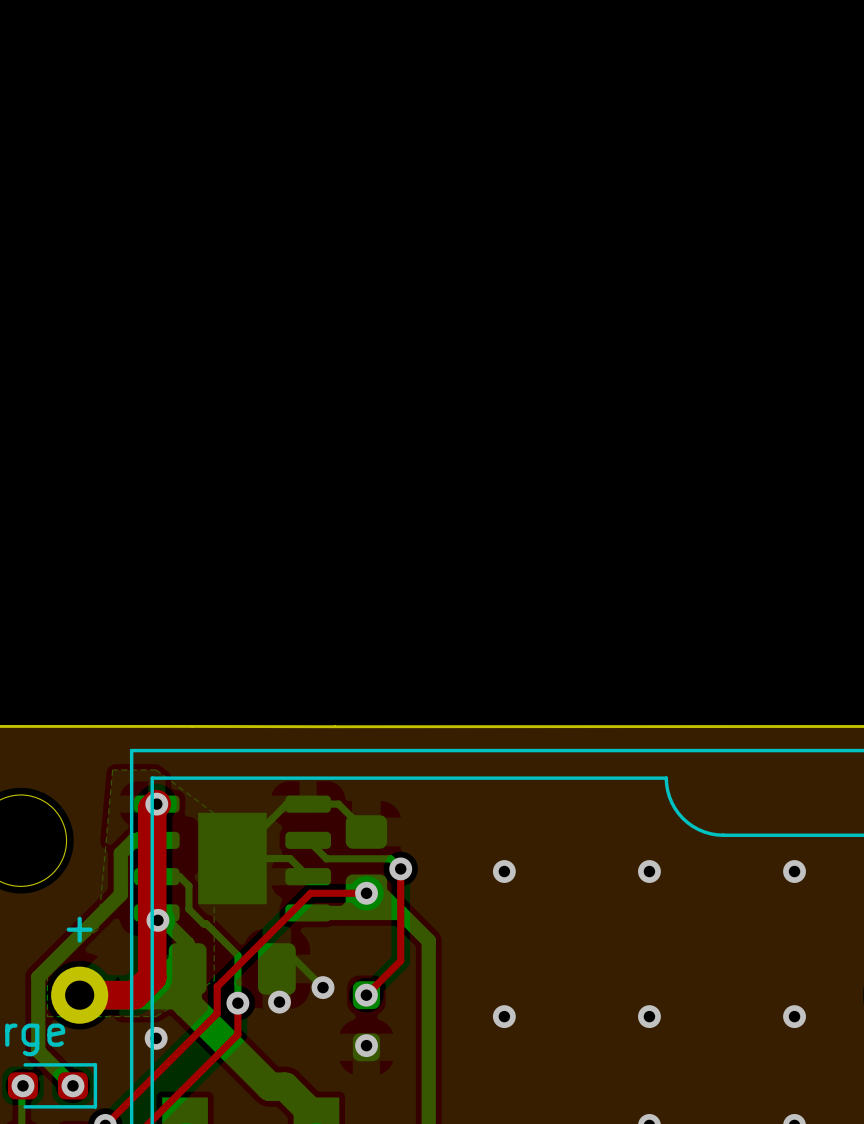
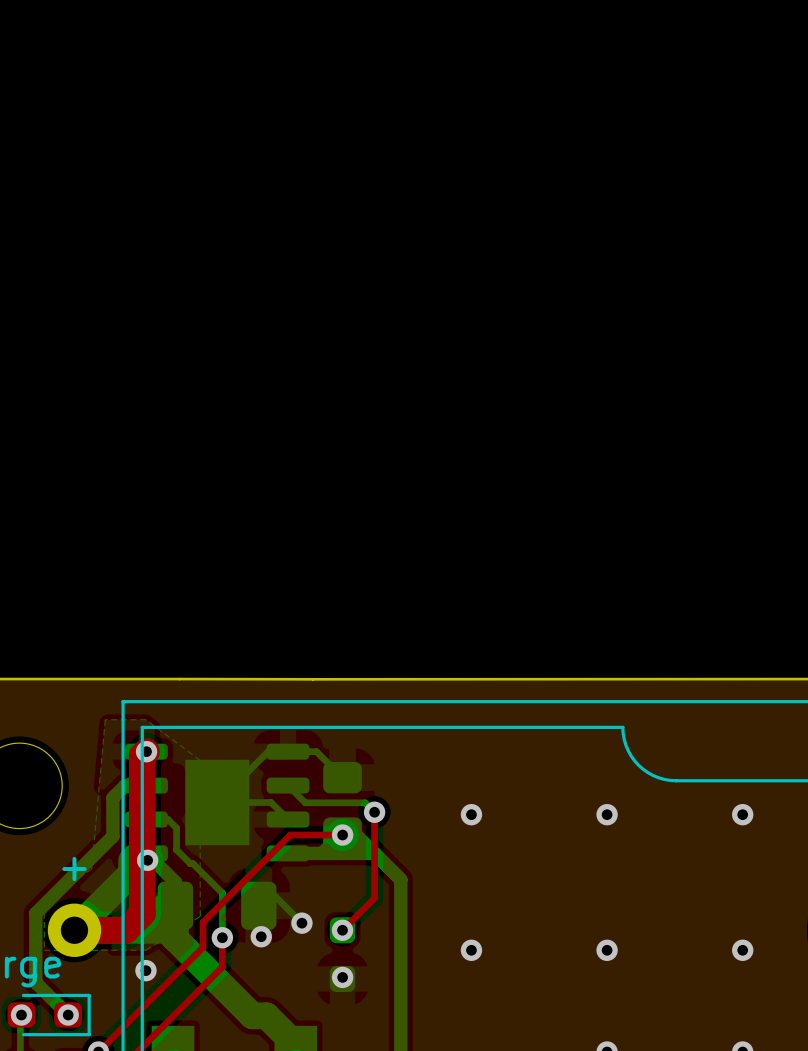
bottom track: none -> (131, 860) (131, 873) (74, 930)

